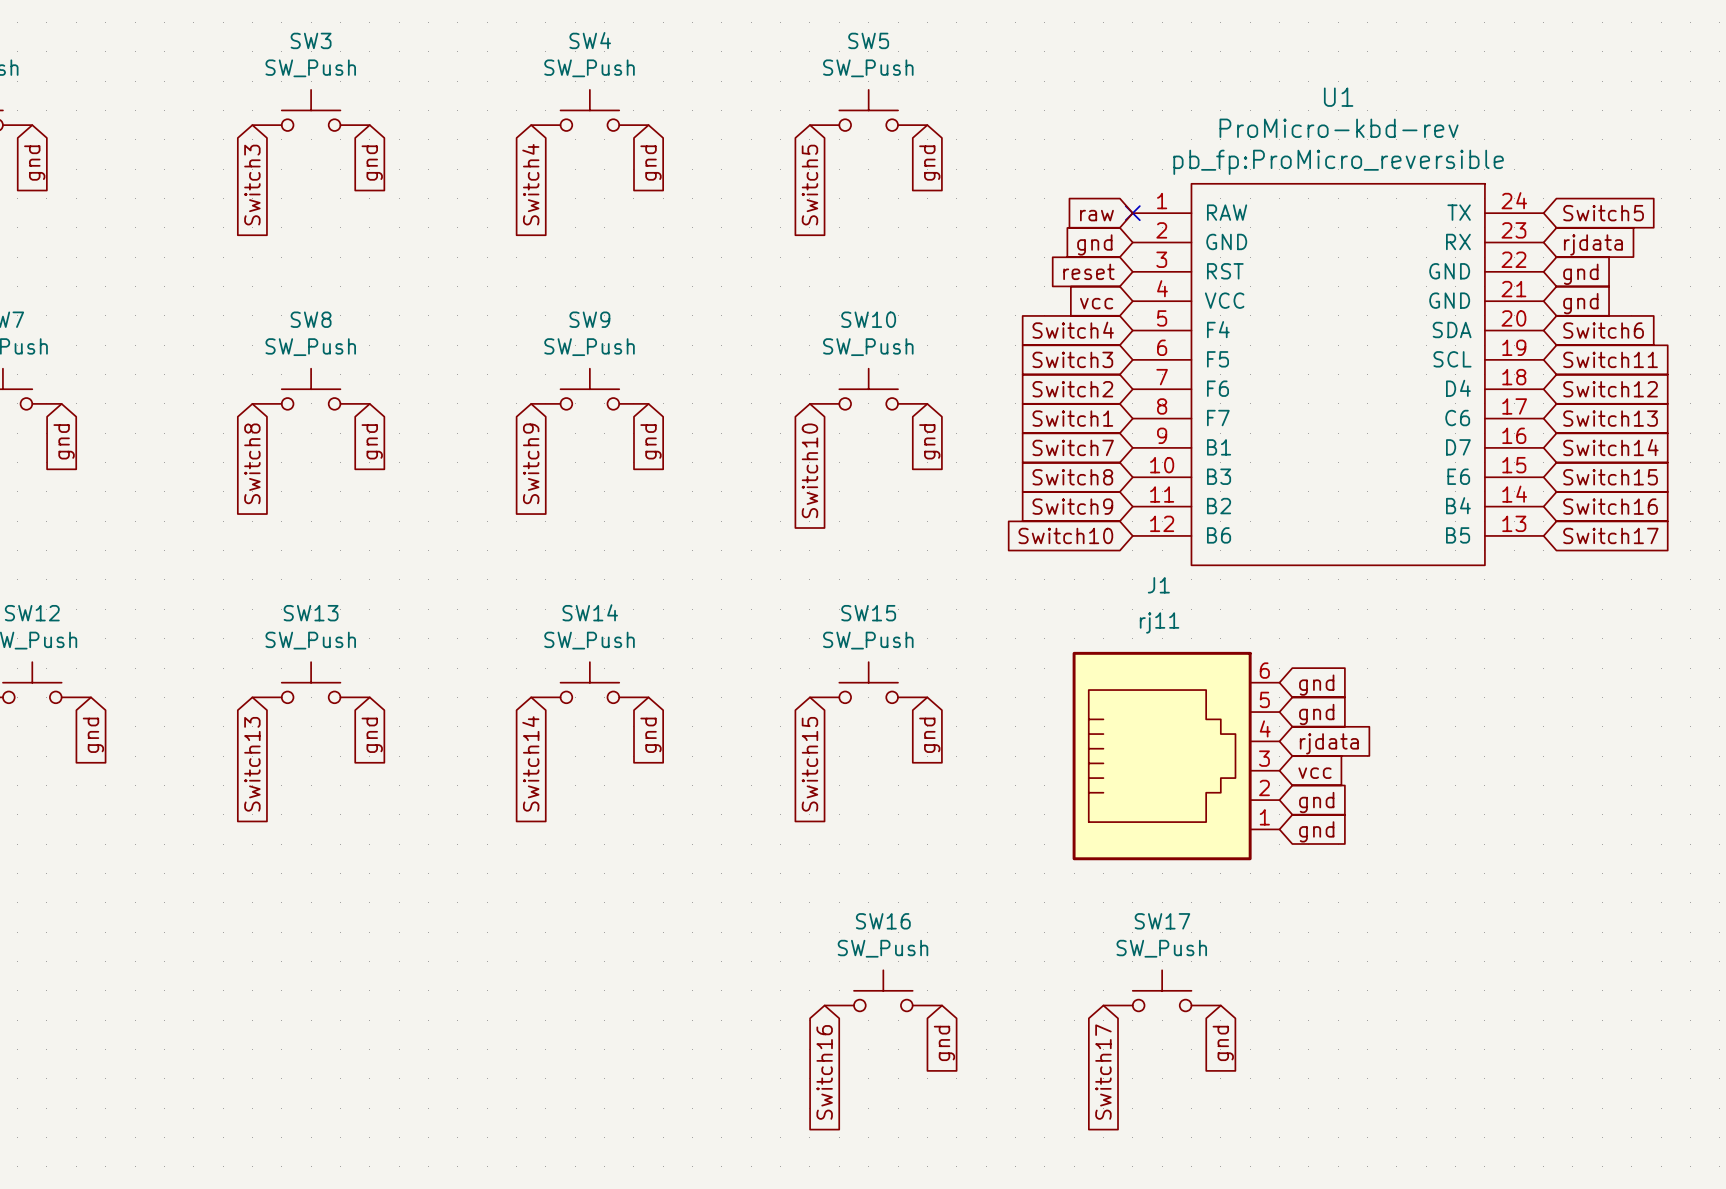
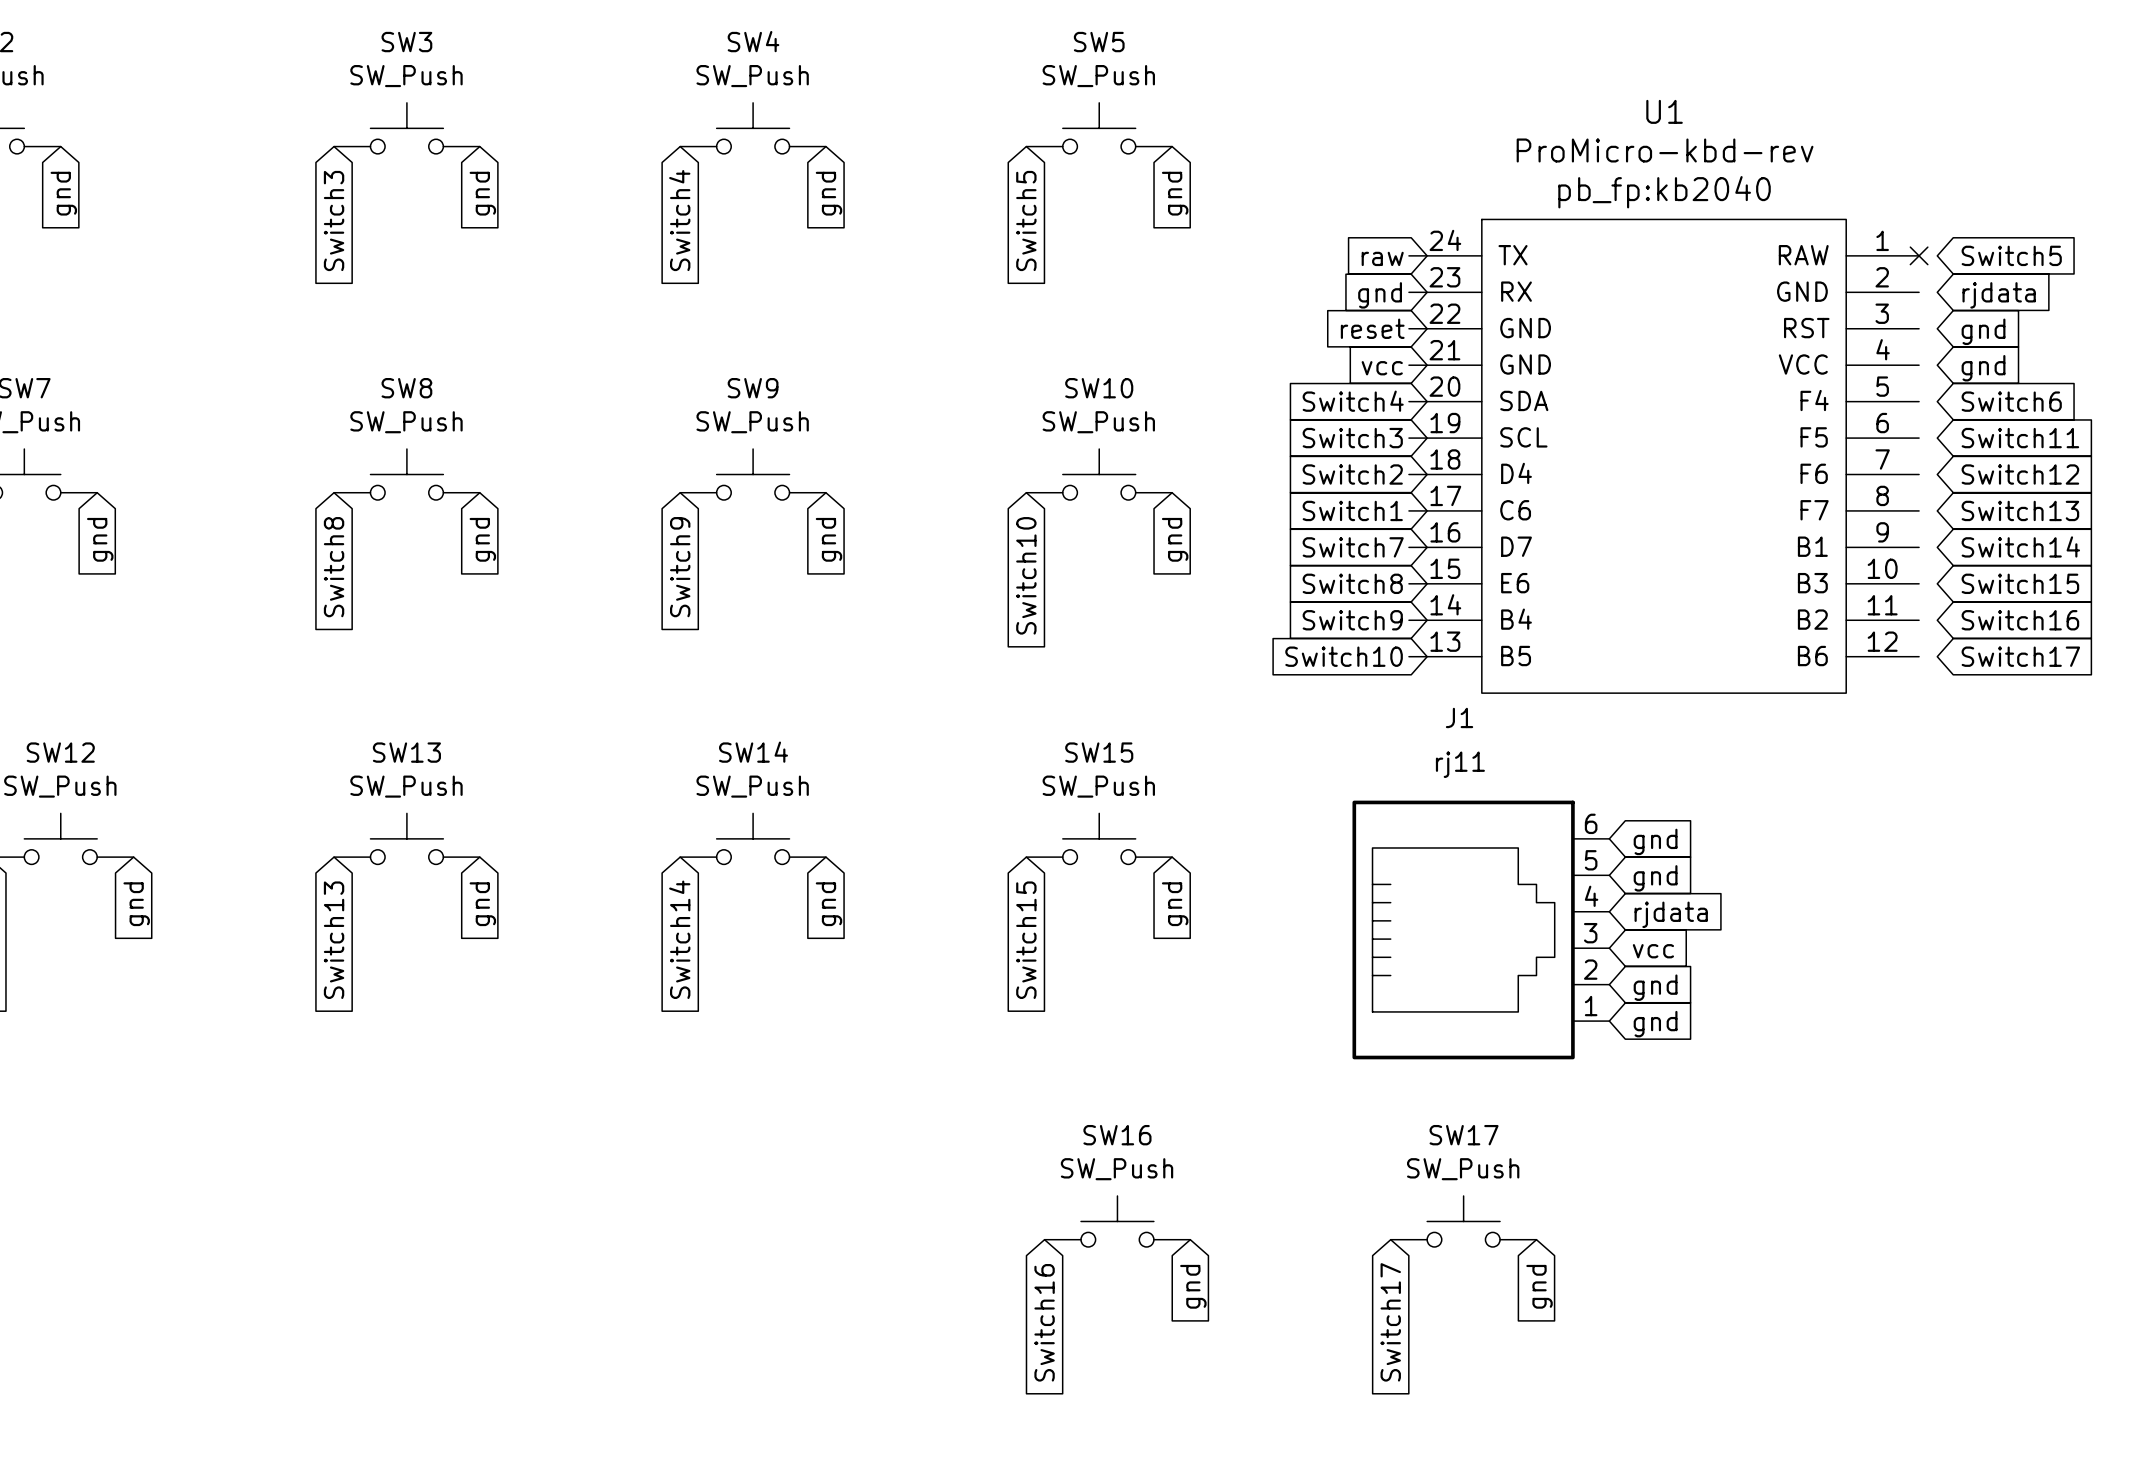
U1 text: pb_fp:ProMicro_reversible (1338, 162) -> pb_fp:kb2040 (1664, 192)
no-connect mark: (1132, 213) -> none
no-connect mark: none -> (1919, 255)
U1 flip: as is (1338, 374) -> left-right (1664, 456)

